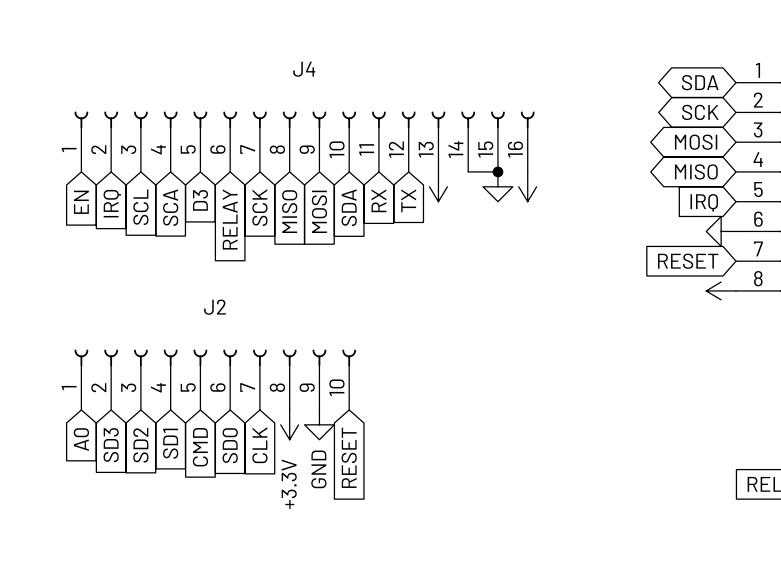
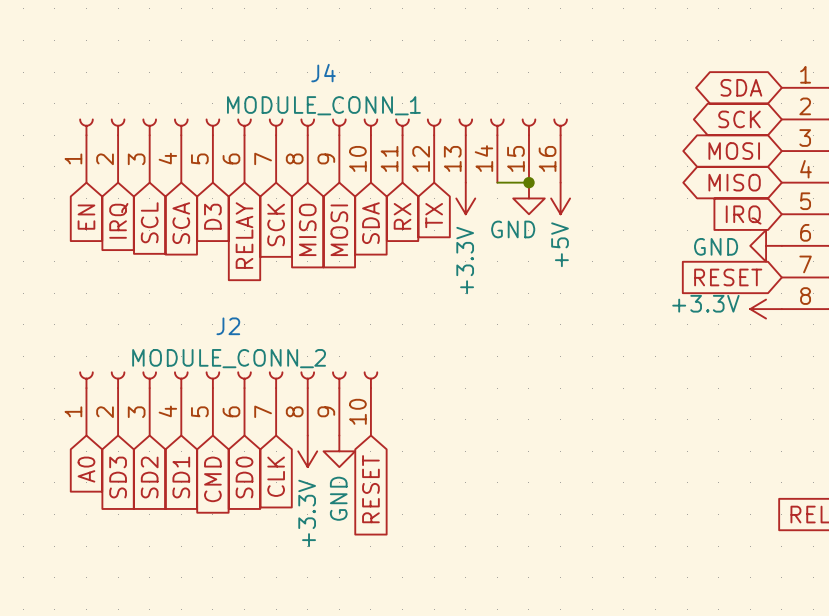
J4 value: none -> MODULE_CONN_1 (323, 105)
power symbol text: none -> GND (513, 229)
power symbol text: none -> +5V (560, 244)
power symbol text: none -> GND (716, 246)
power symbol text: none -> +3.3V (465, 260)
power symbol text: none -> +3.3V (705, 303)
J2 value: none -> MODULE_CONN_2 (229, 358)

